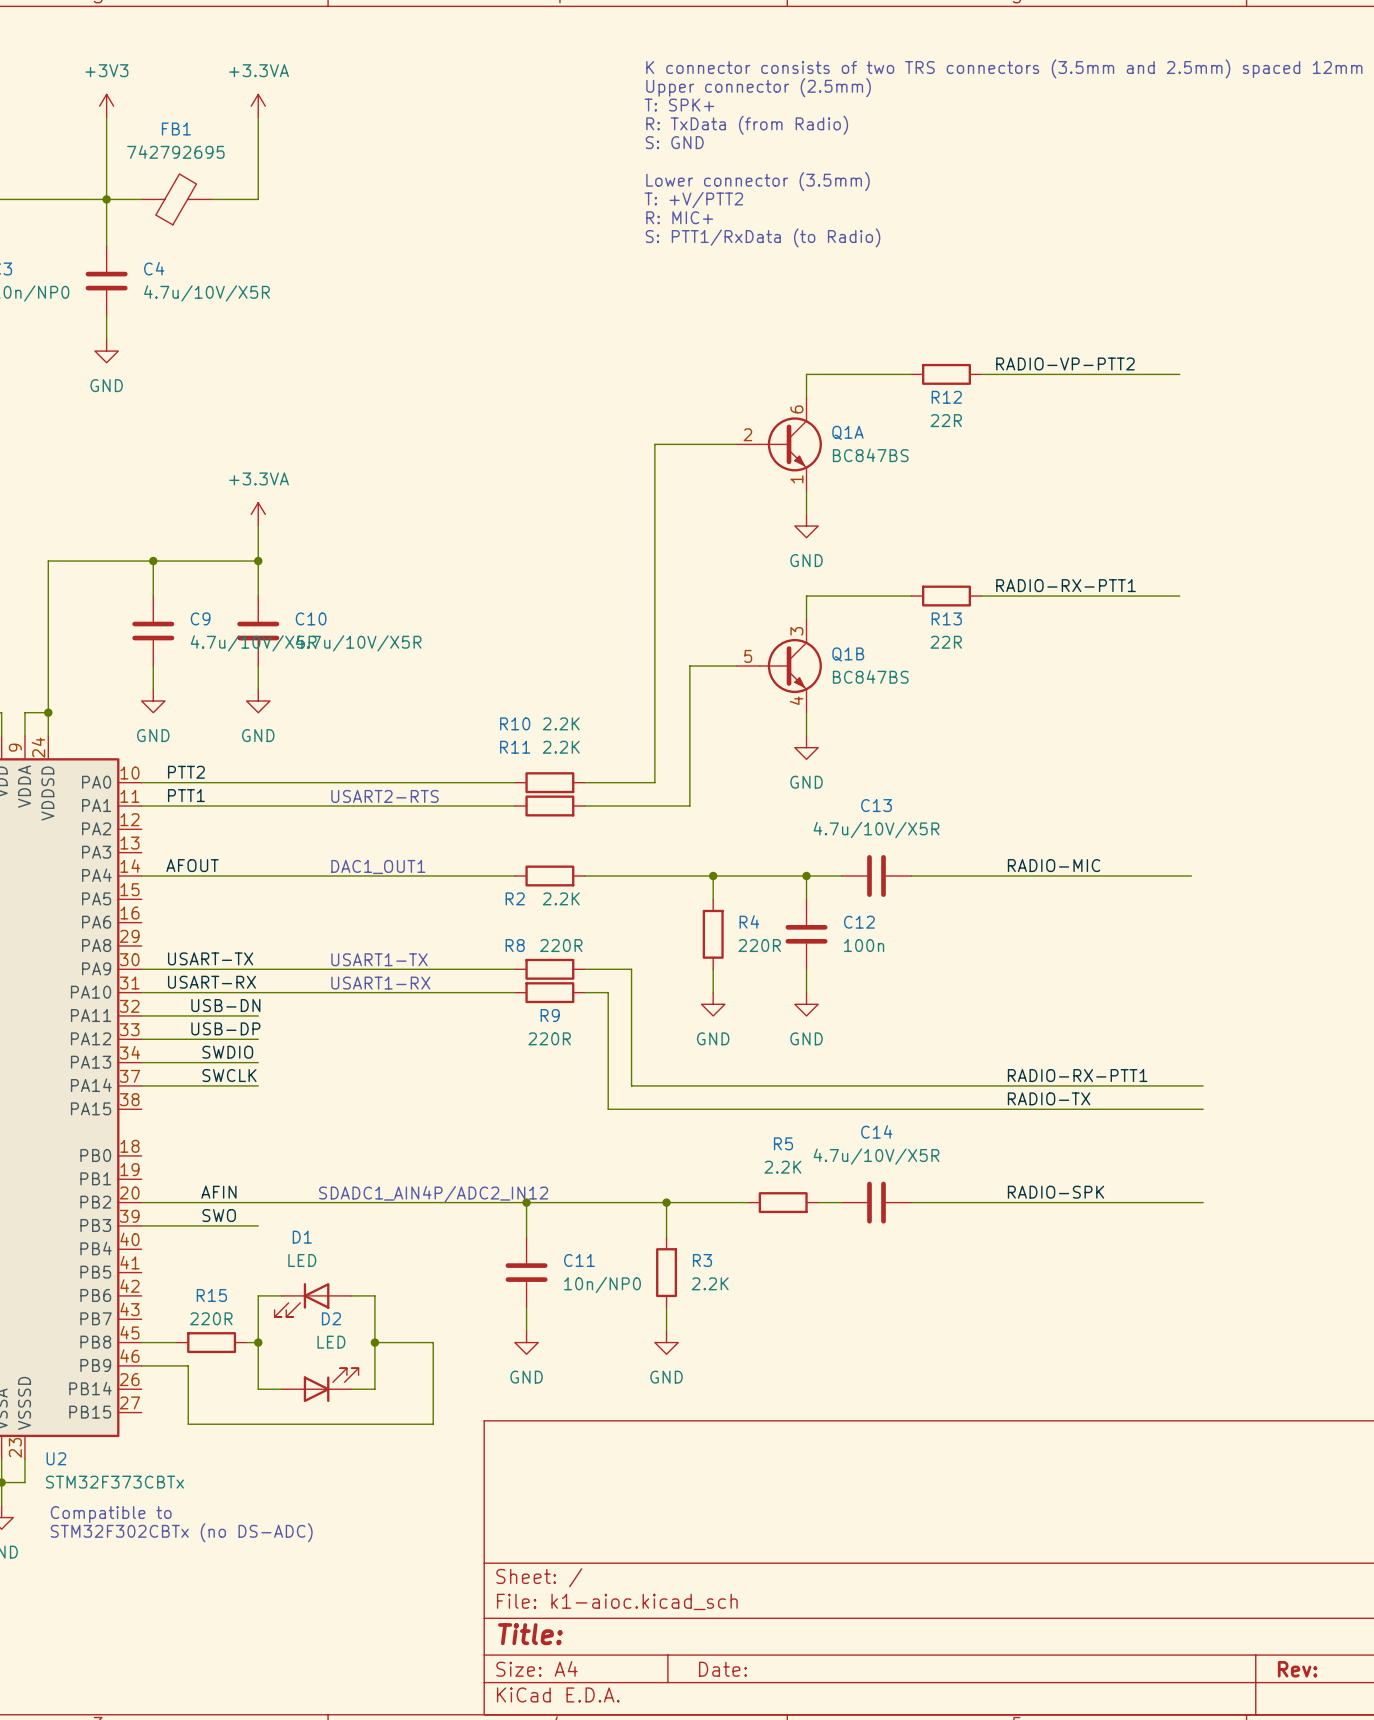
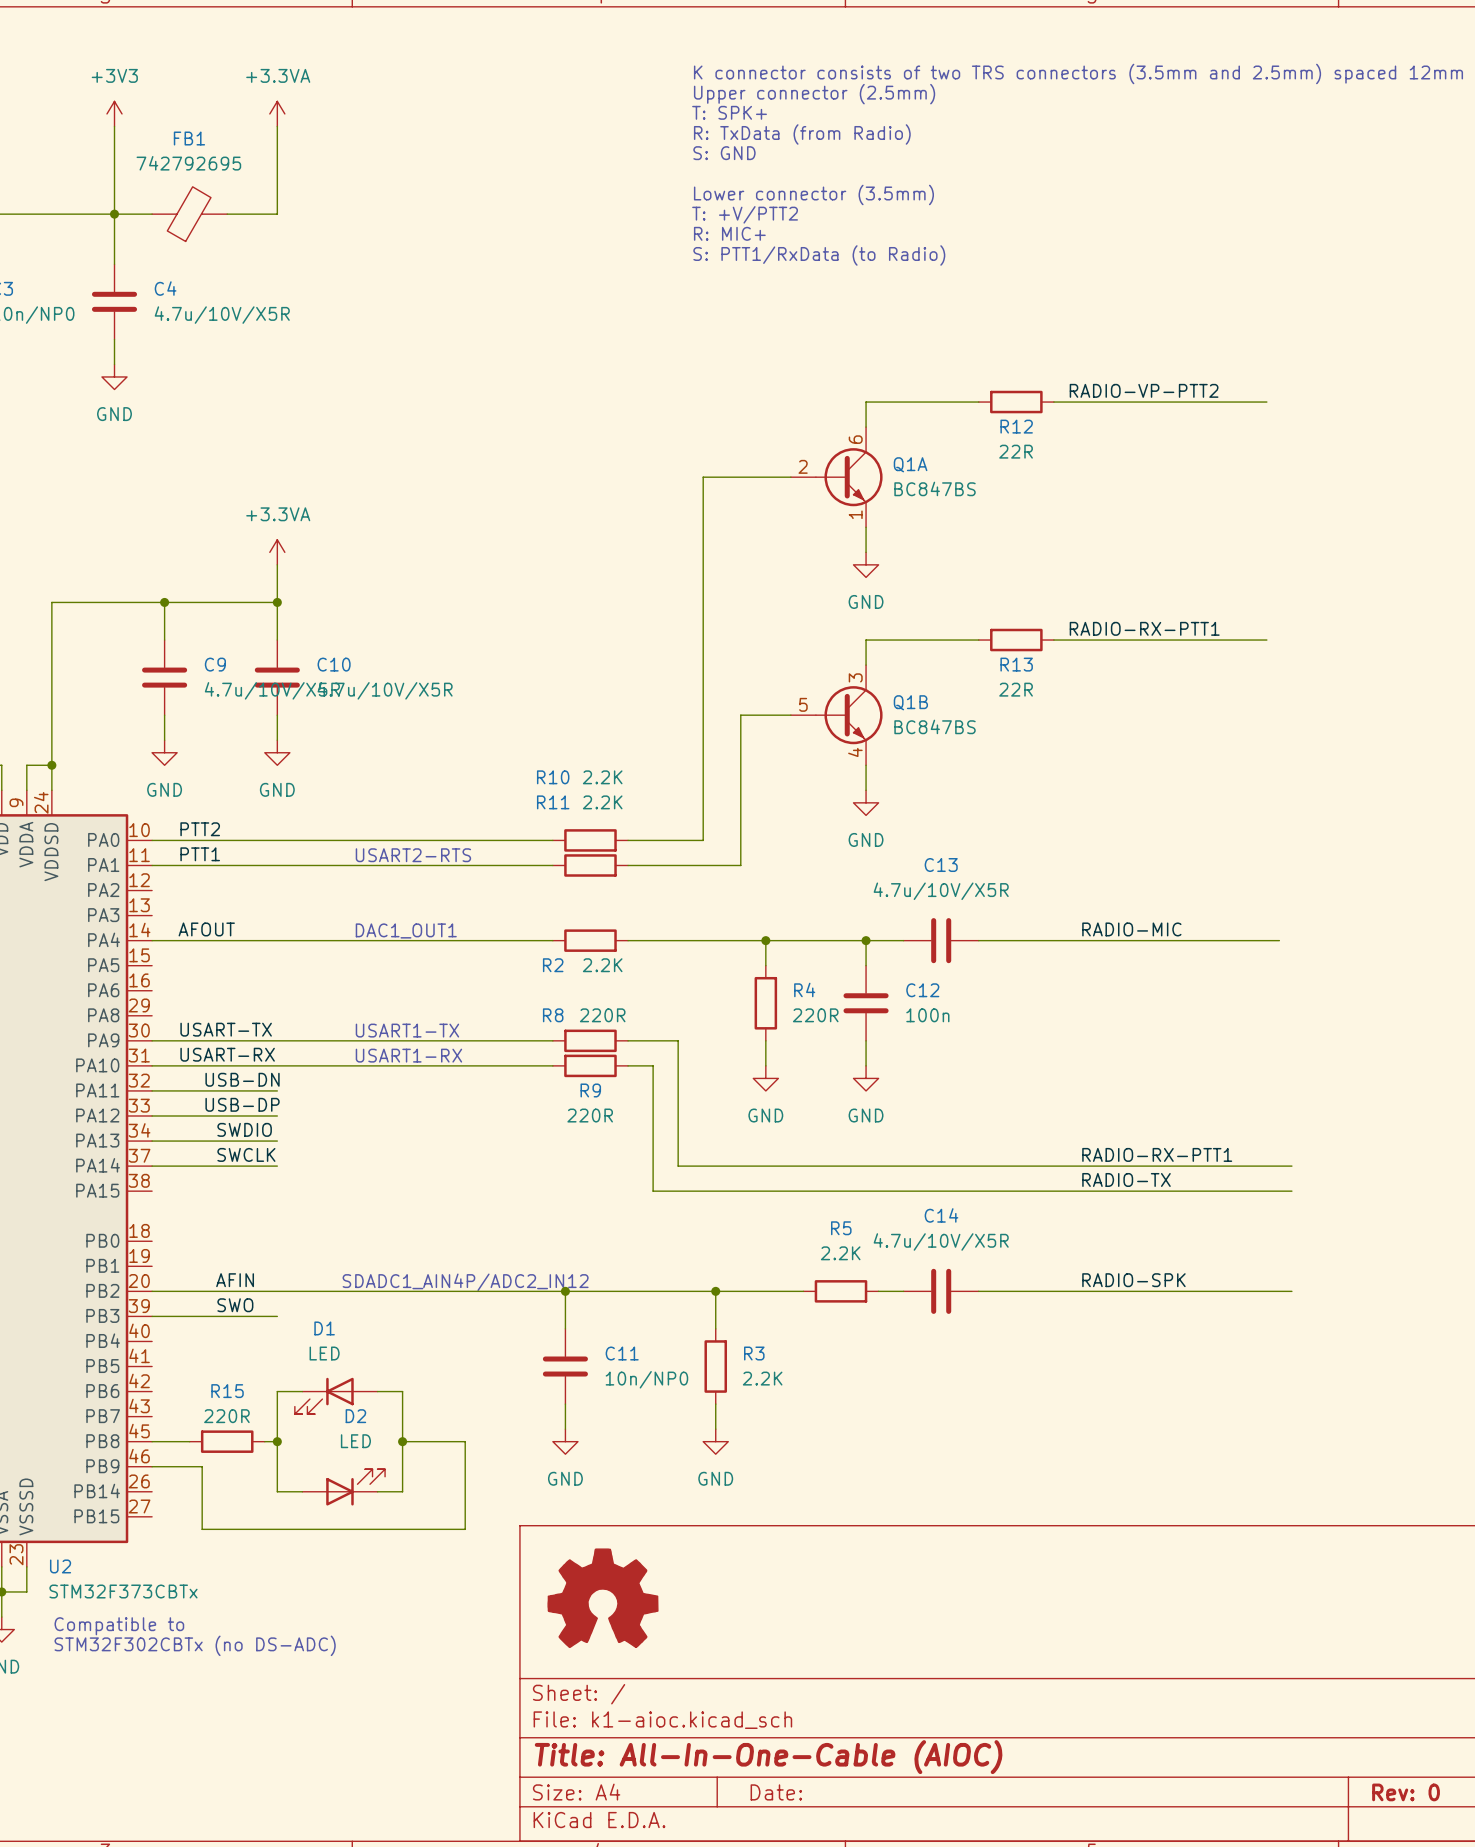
power symbol: none -> (603, 1598)
title block: Title: (530, 1634) -> Title: All-In-One-Cable (AIOC) (768, 1757)
title block: Rev: (1297, 1669) -> Rev: 0 (1406, 1792)

